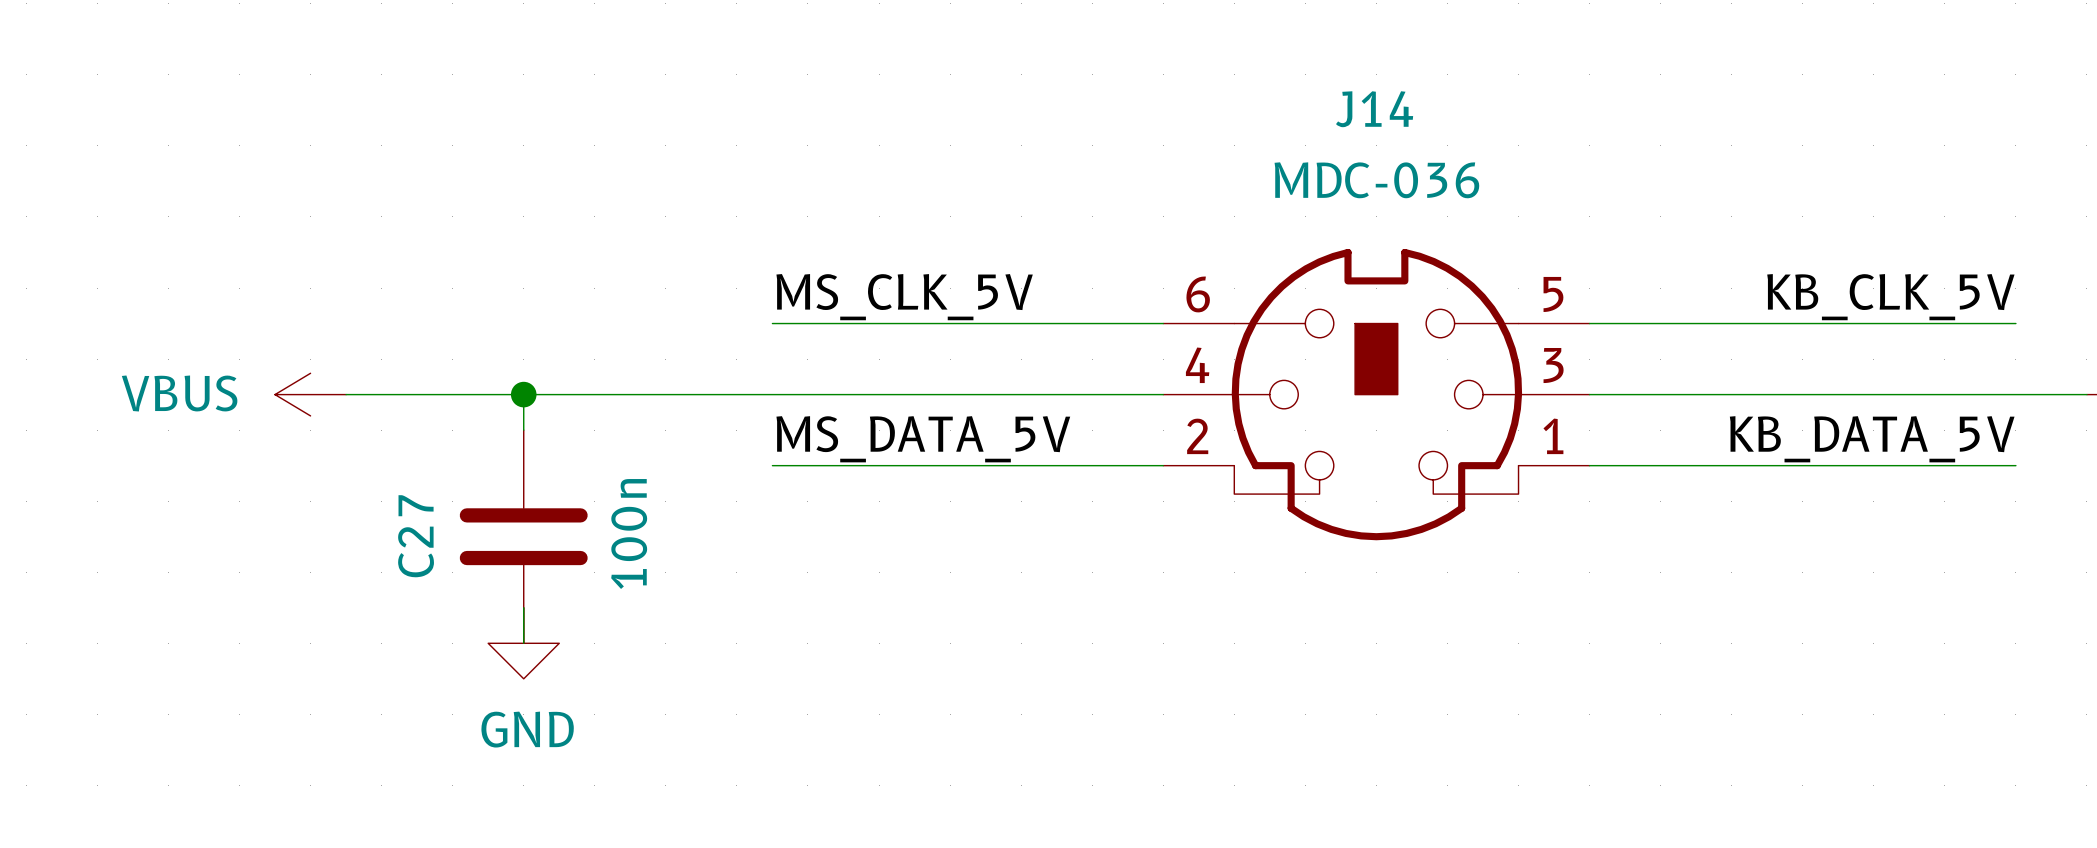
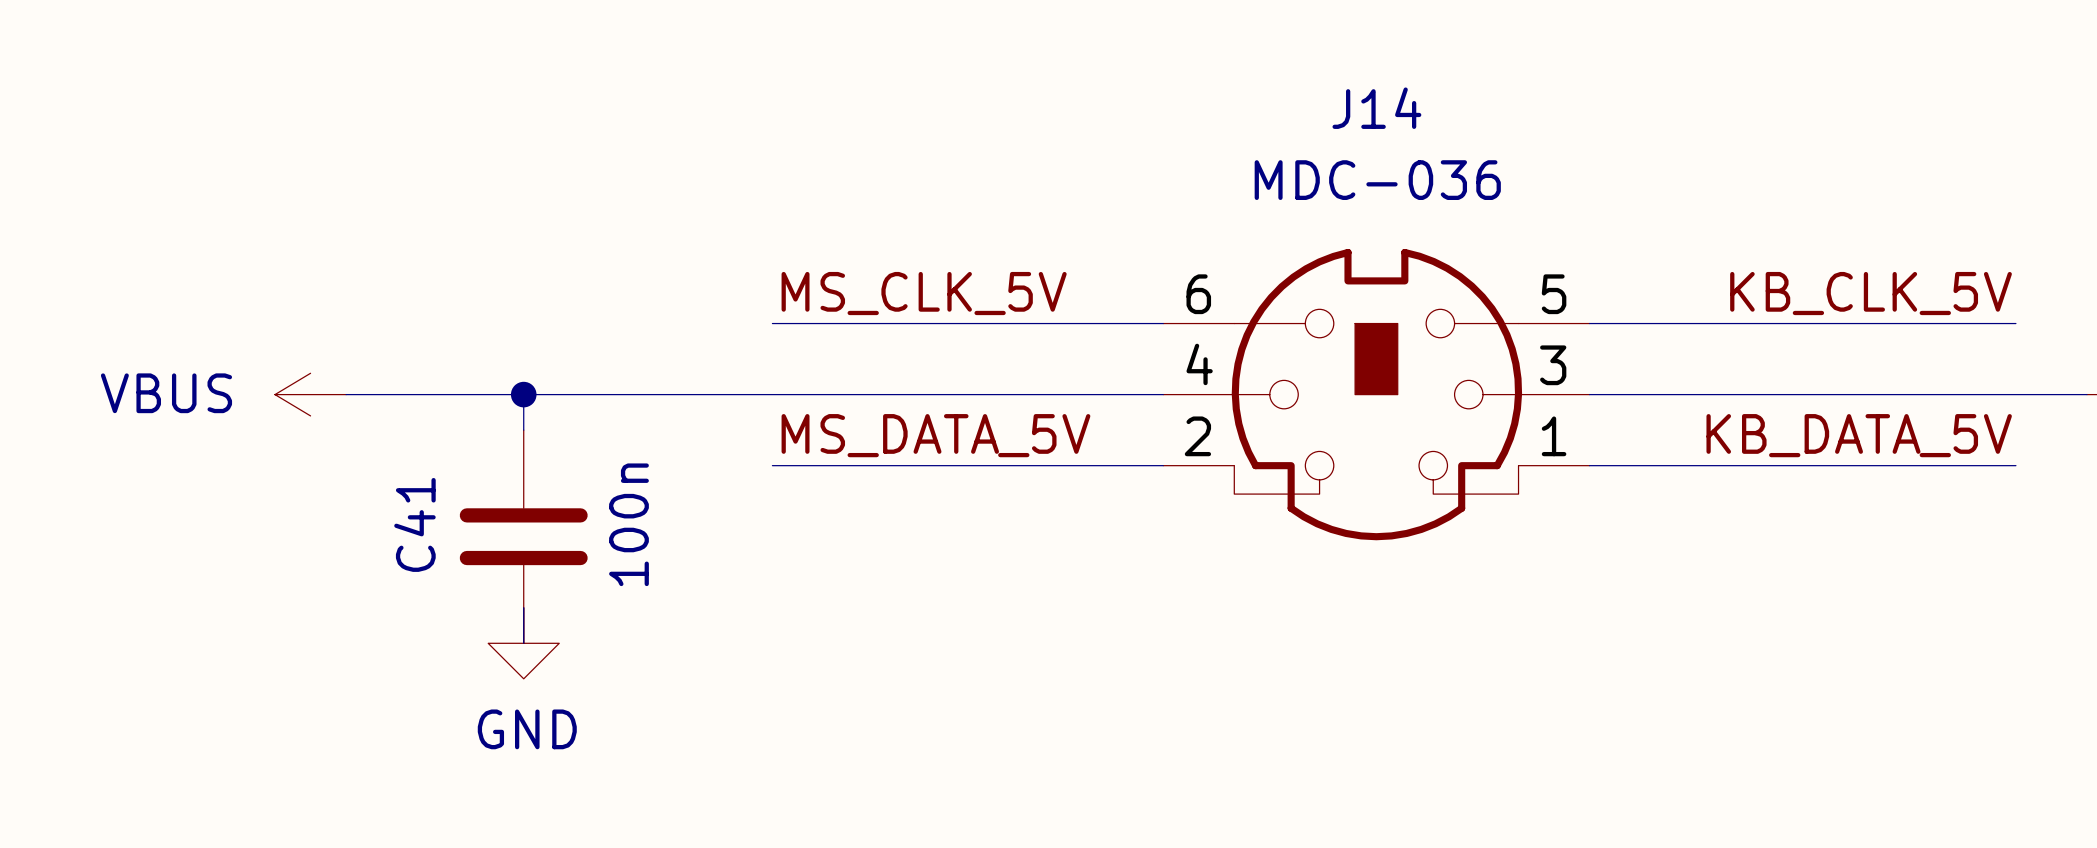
C27 name: C27 (416, 536) -> C41 (414, 524)

